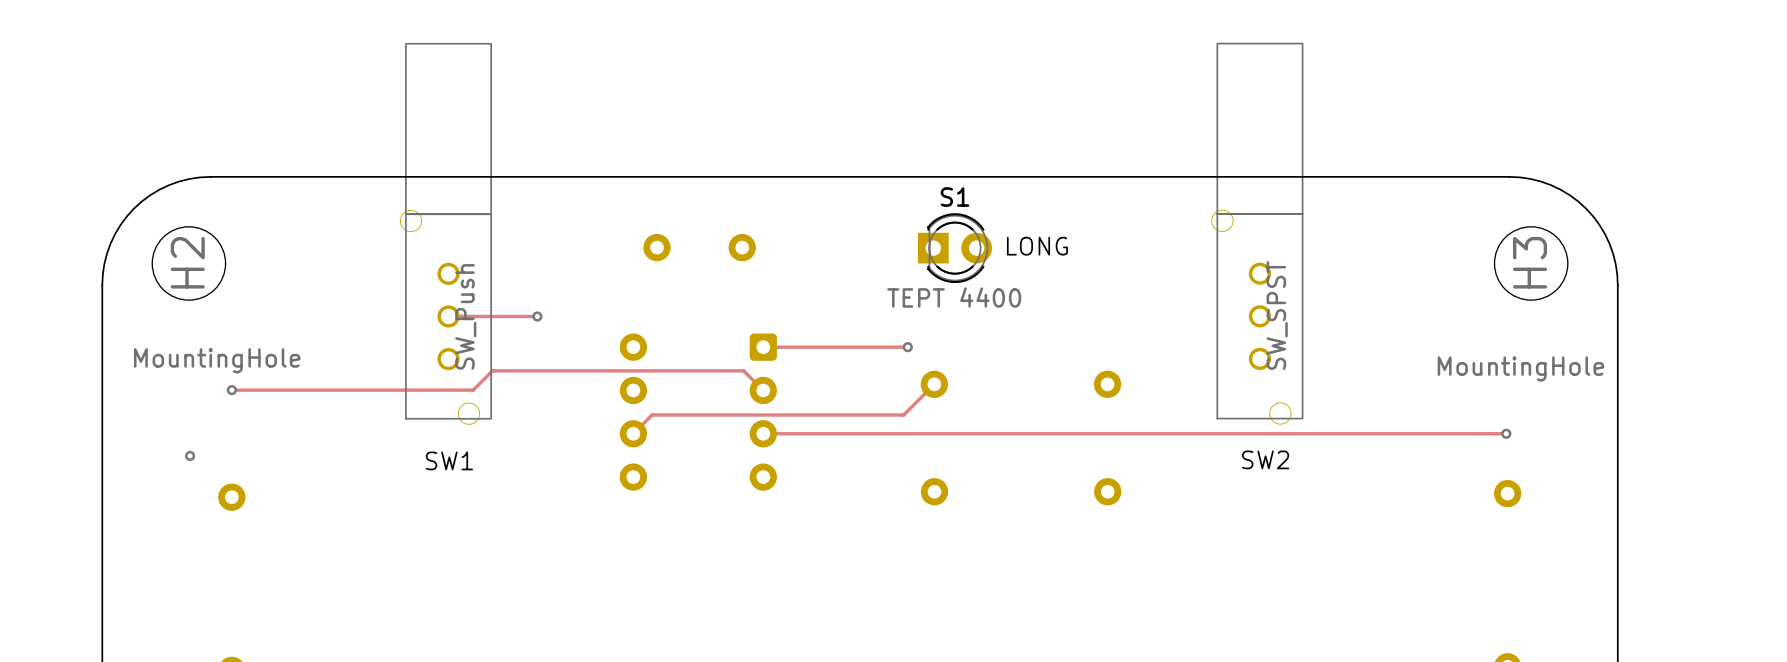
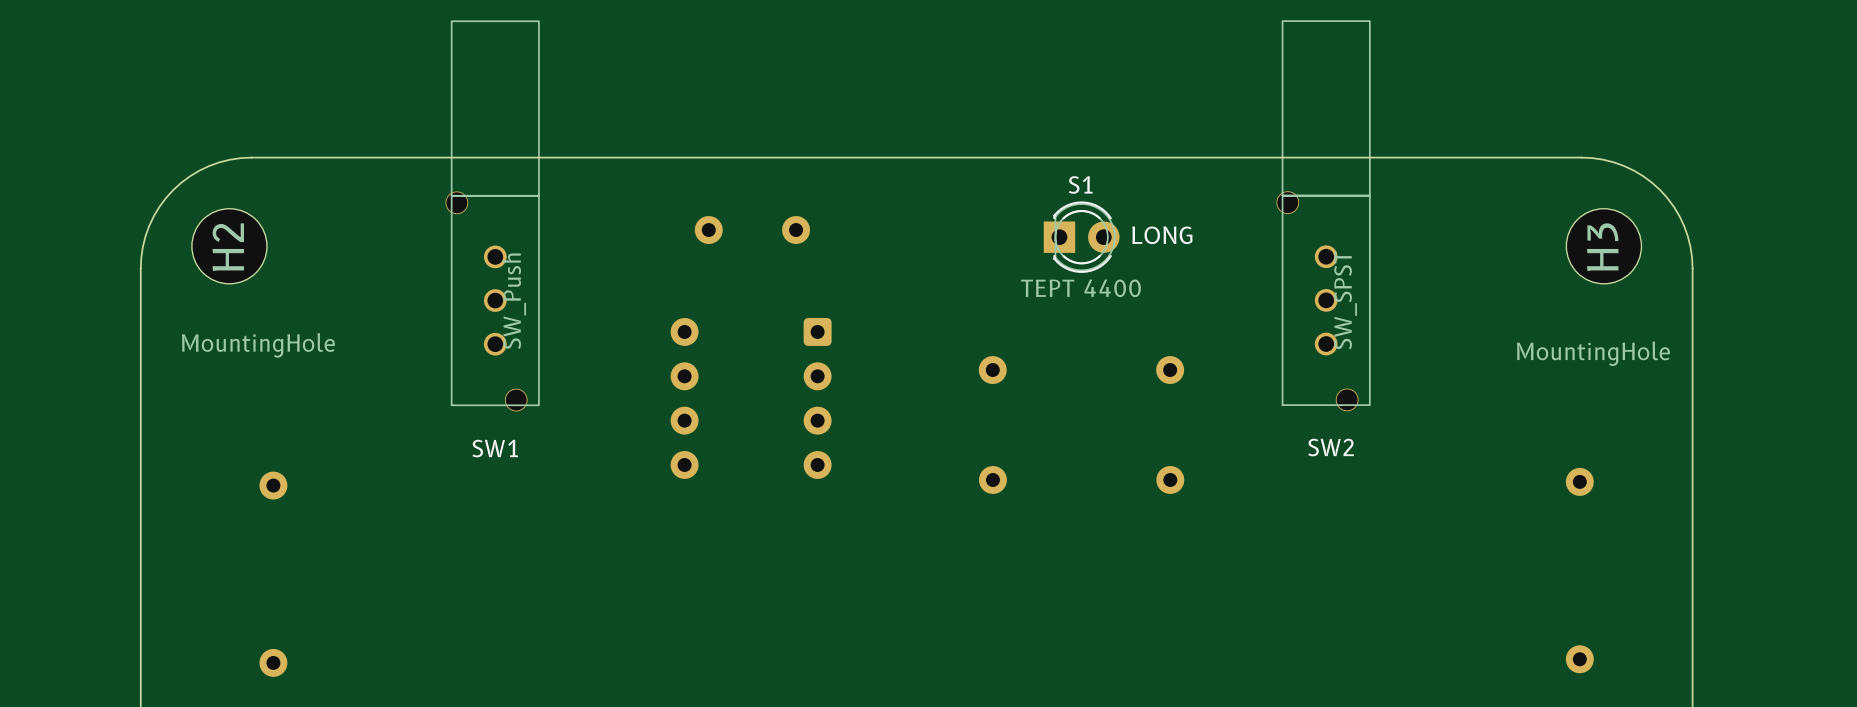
S1 position: (954, 248) -> (1081, 237)
track: (448, 316) (537, 316) -> none
via: (537, 316) -> none
track: (763, 347) (907, 347) -> none
via: (907, 347) -> none
track: (934, 384) (903, 415) (652, 415) (633, 433) -> none
track: (231, 387) (231, 390) (473, 390) (492, 370) (743, 370) (763, 390) -> none
via: (231, 390) -> none
track: (763, 433) (1506, 433) -> none
via: (1506, 433) -> none
via: (190, 455) -> none

